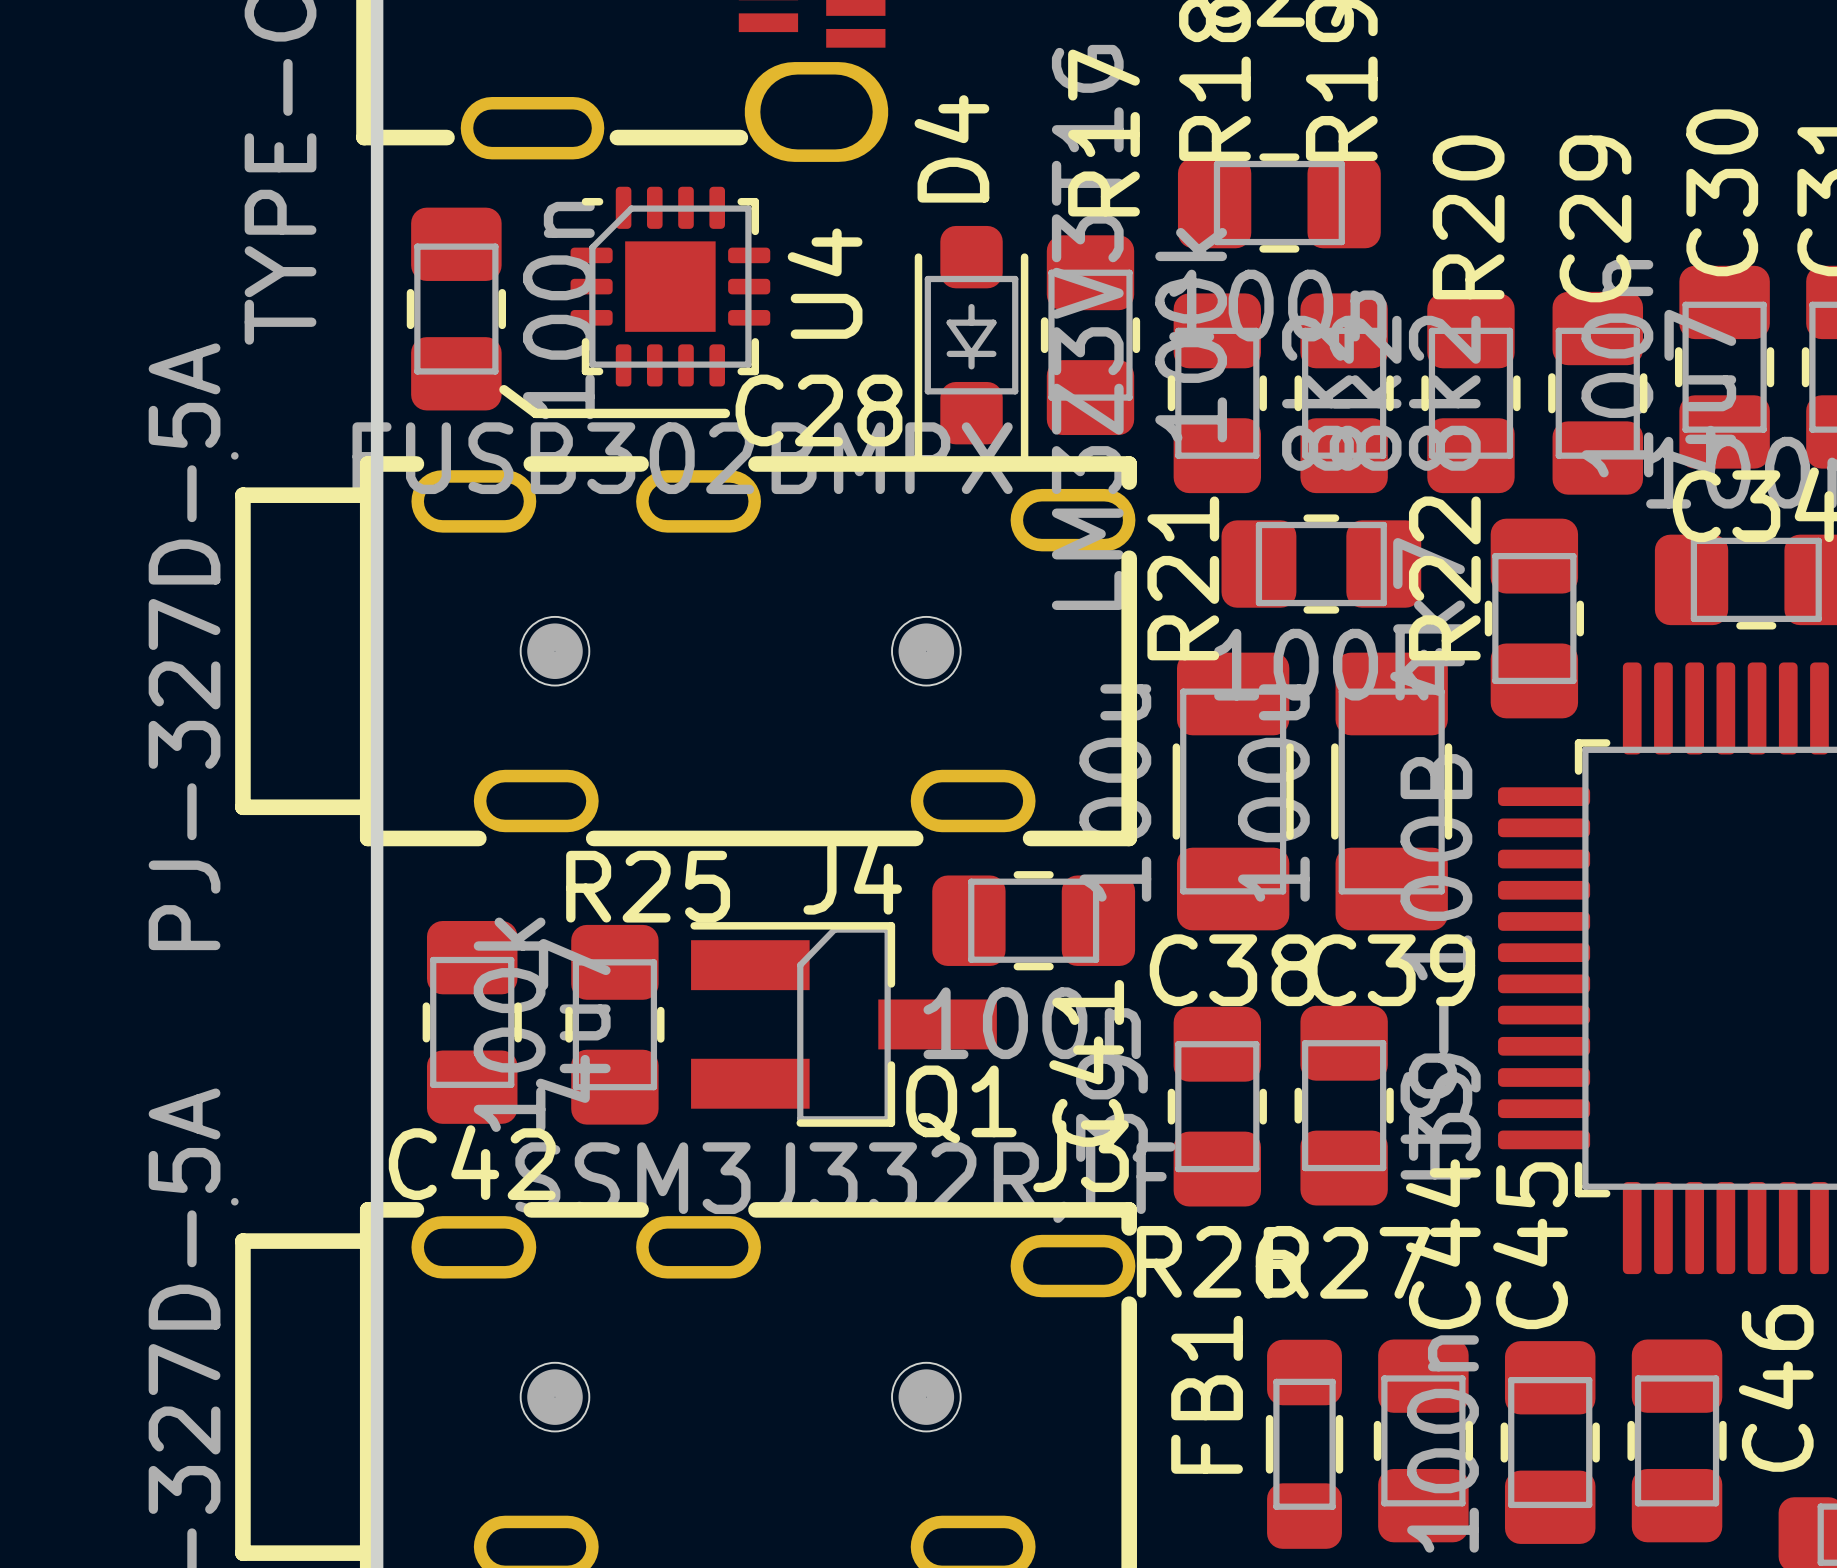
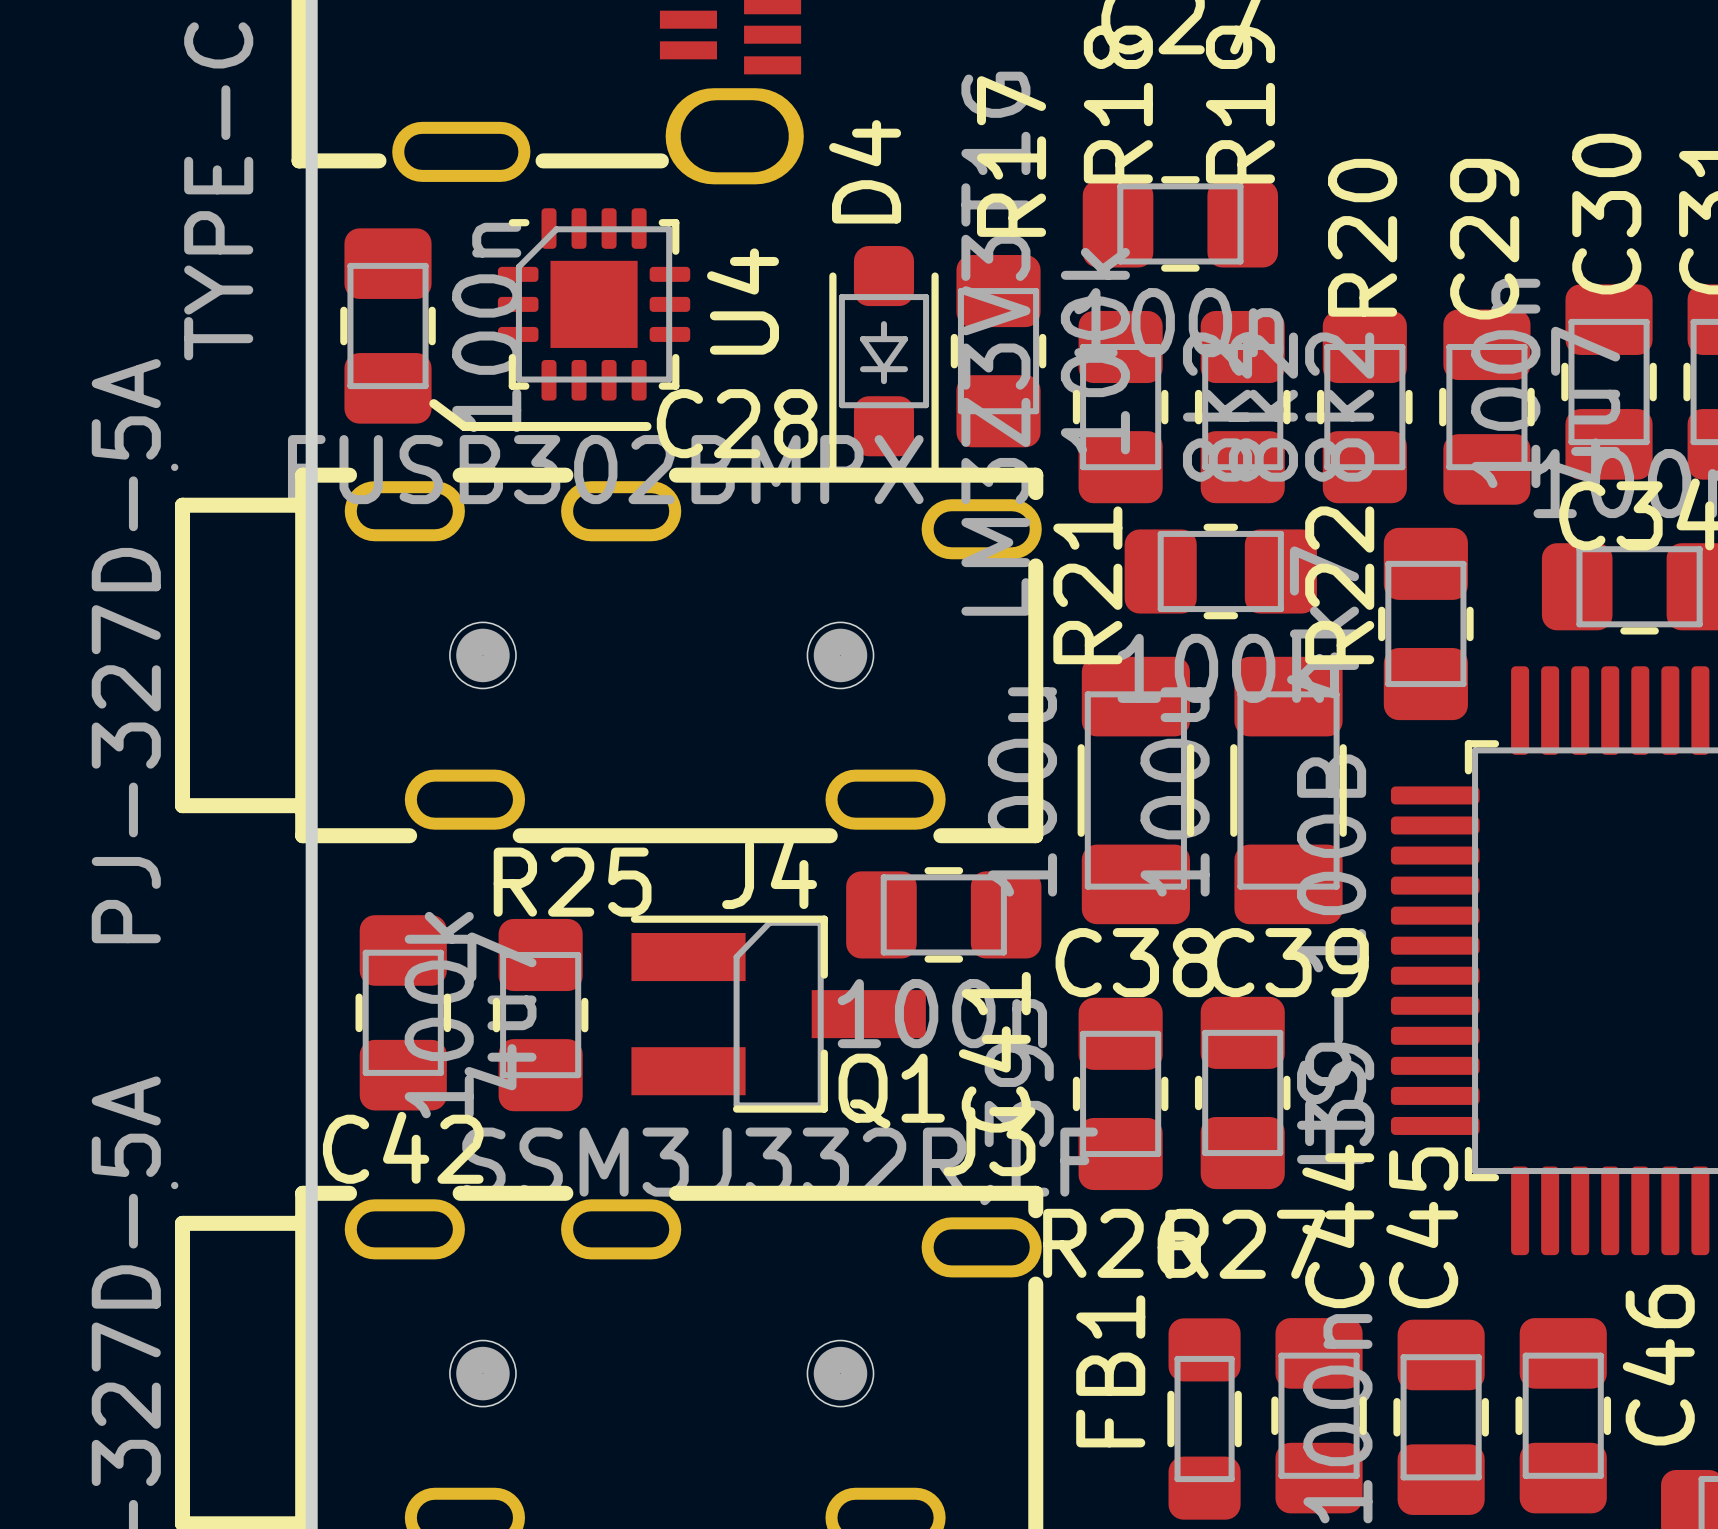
Q1 position: (843, 1024) -> (778, 1014)

